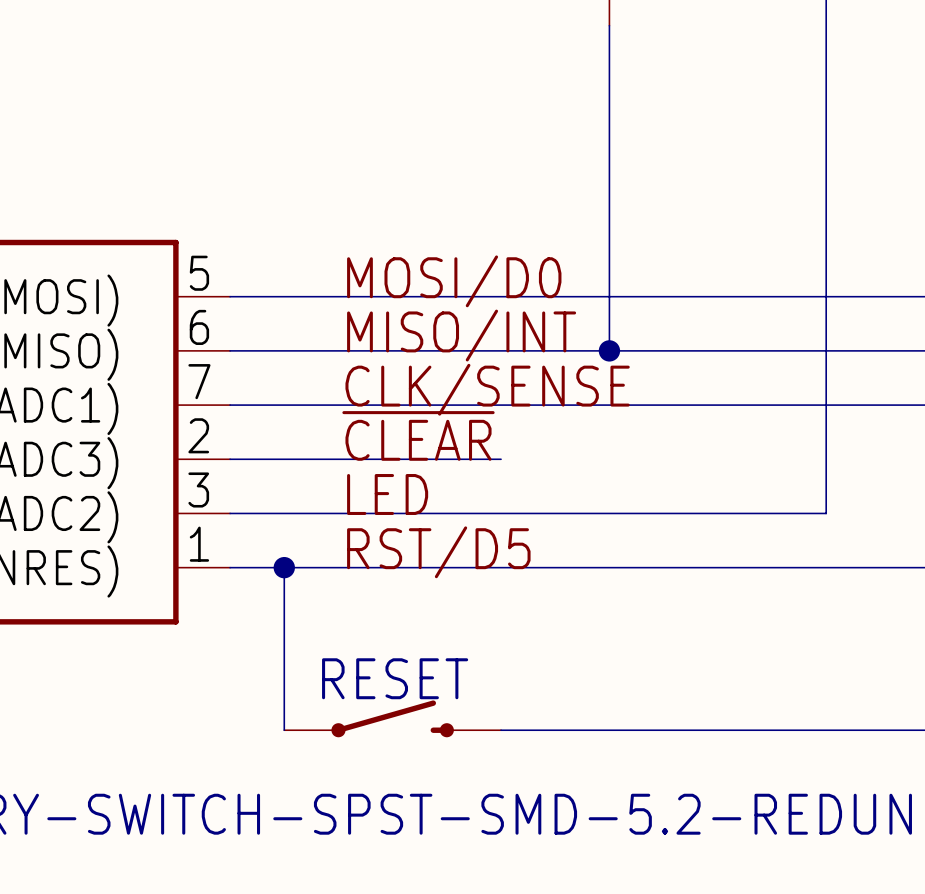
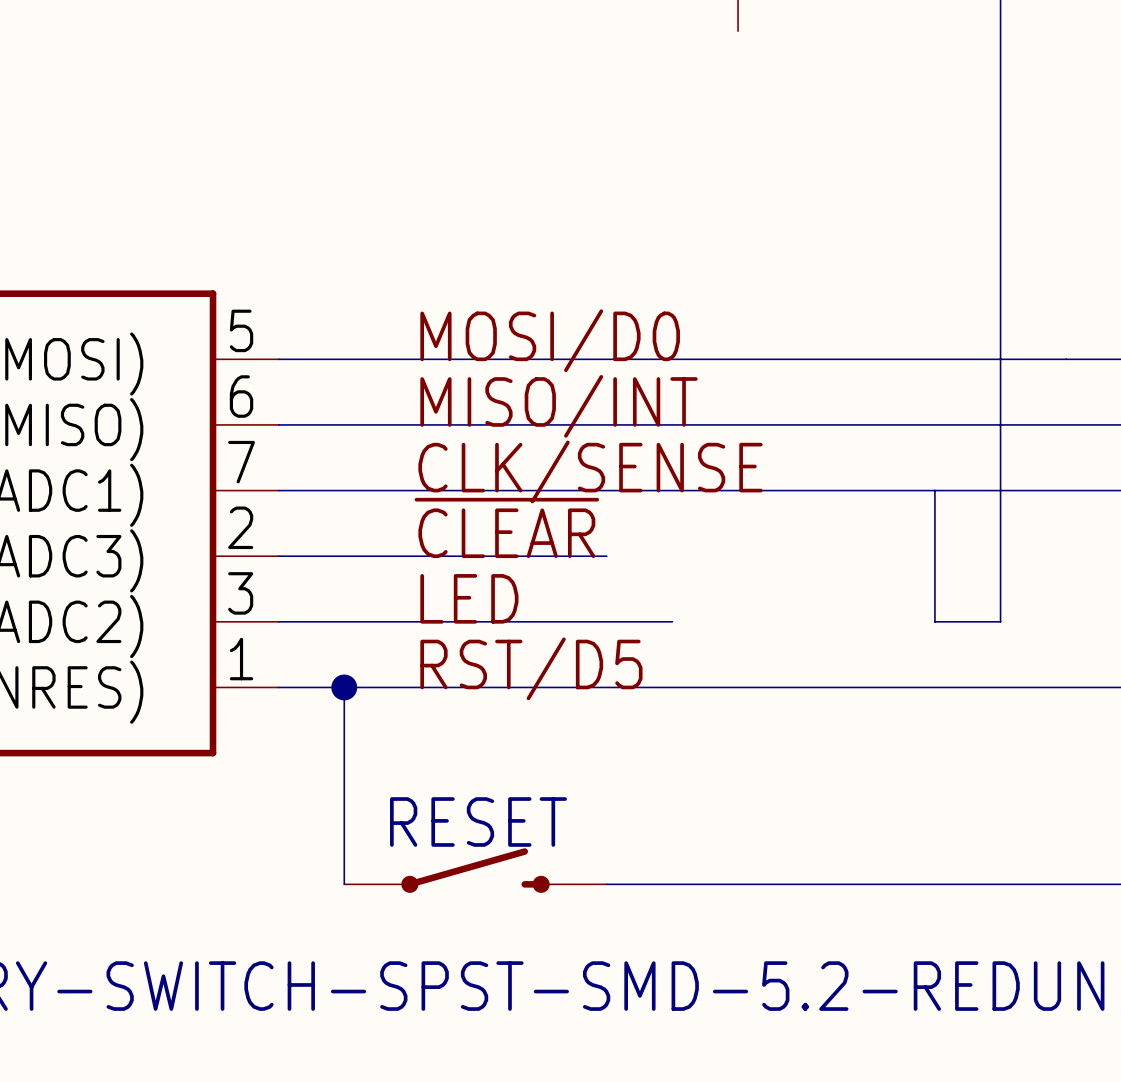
wire: (609, 25) (609, 350) -> none
junction: (609, 350) -> none
wire: (555, 513) (772, 513) -> (934, 490) (934, 621)

